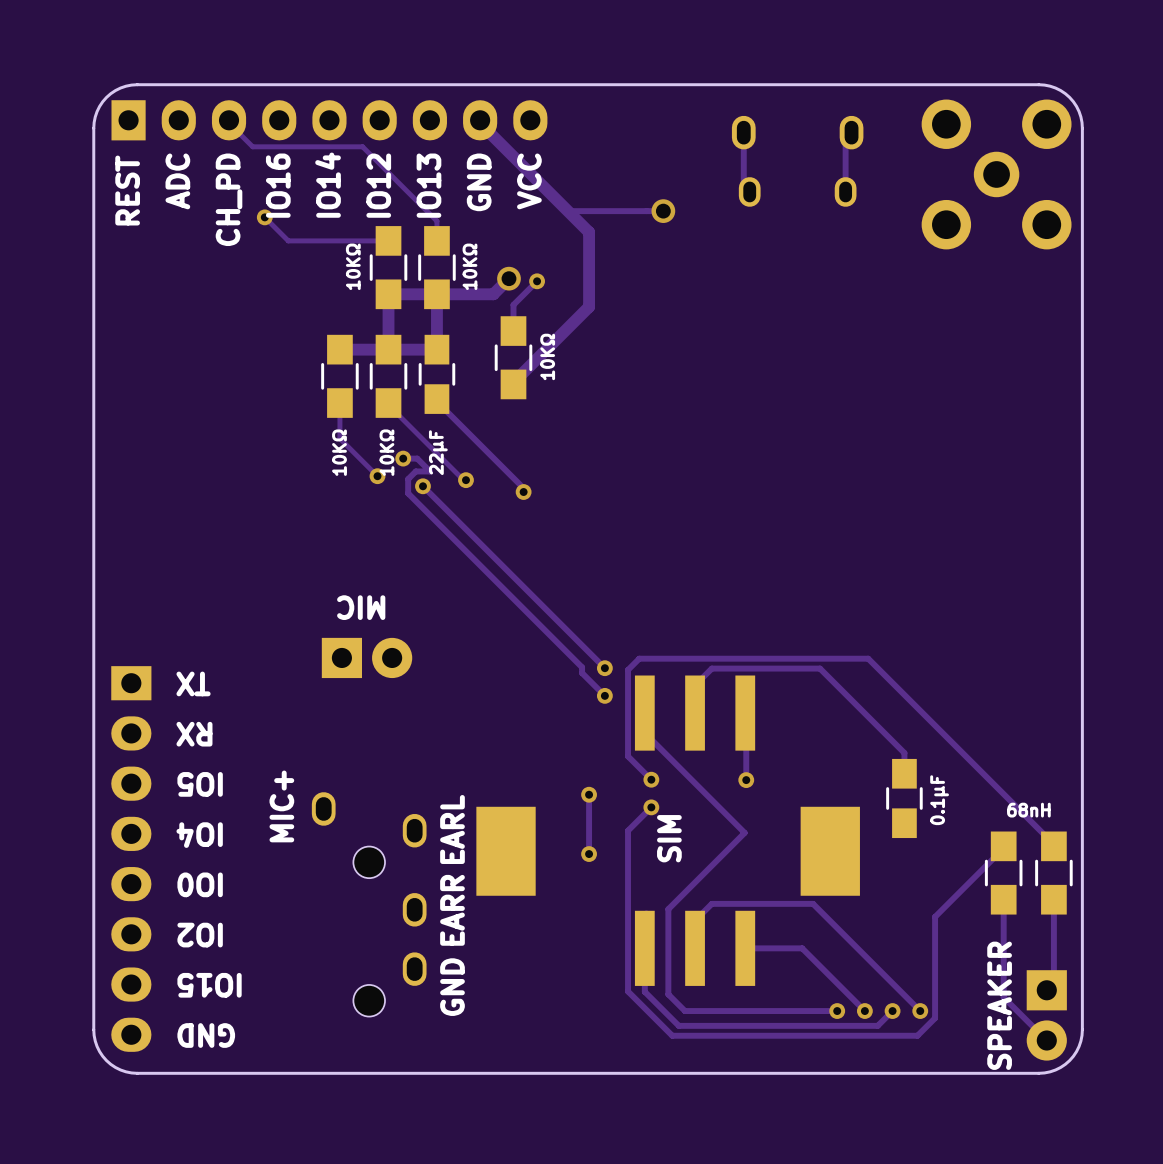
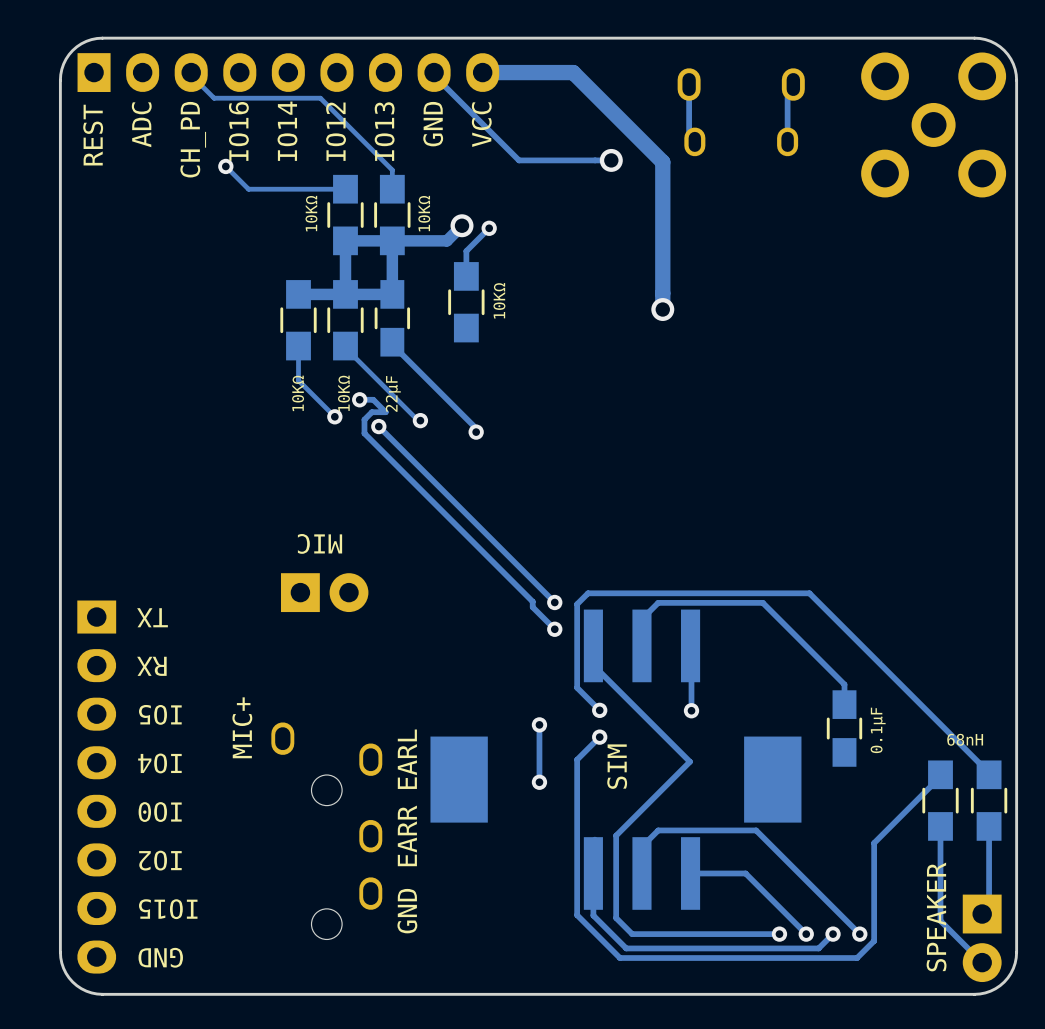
track: none -> (482, 72) (573, 72) (662, 162) (662, 309)
track: (480, 123) (589, 232) (589, 306) (513, 384) -> none
via: none -> (662, 309)

